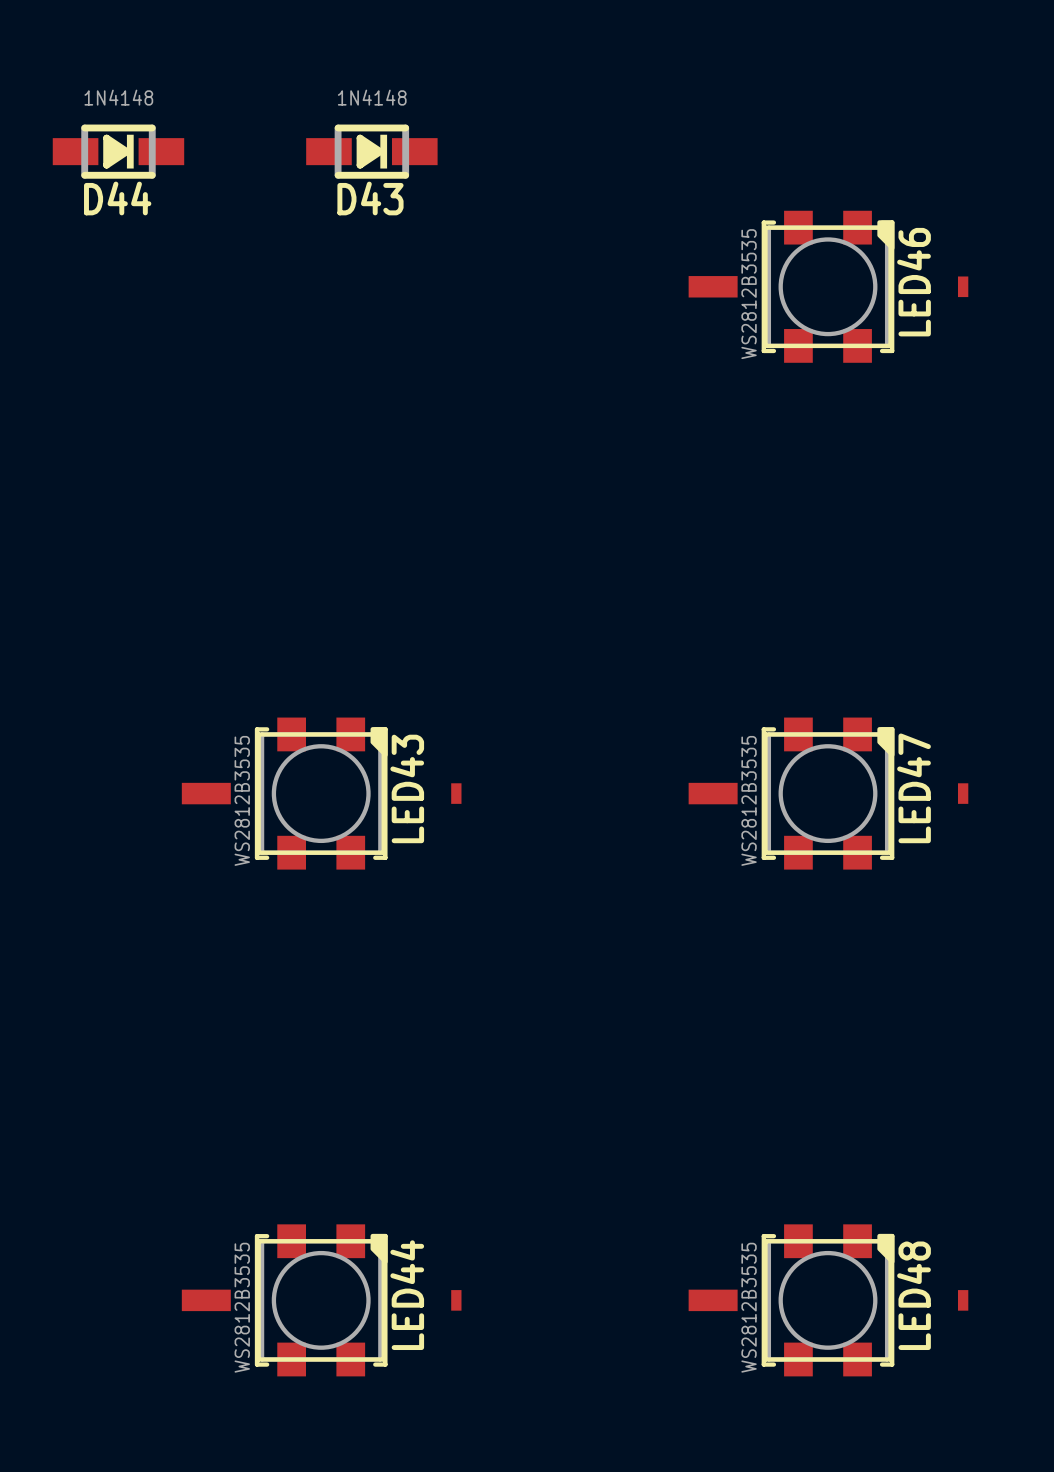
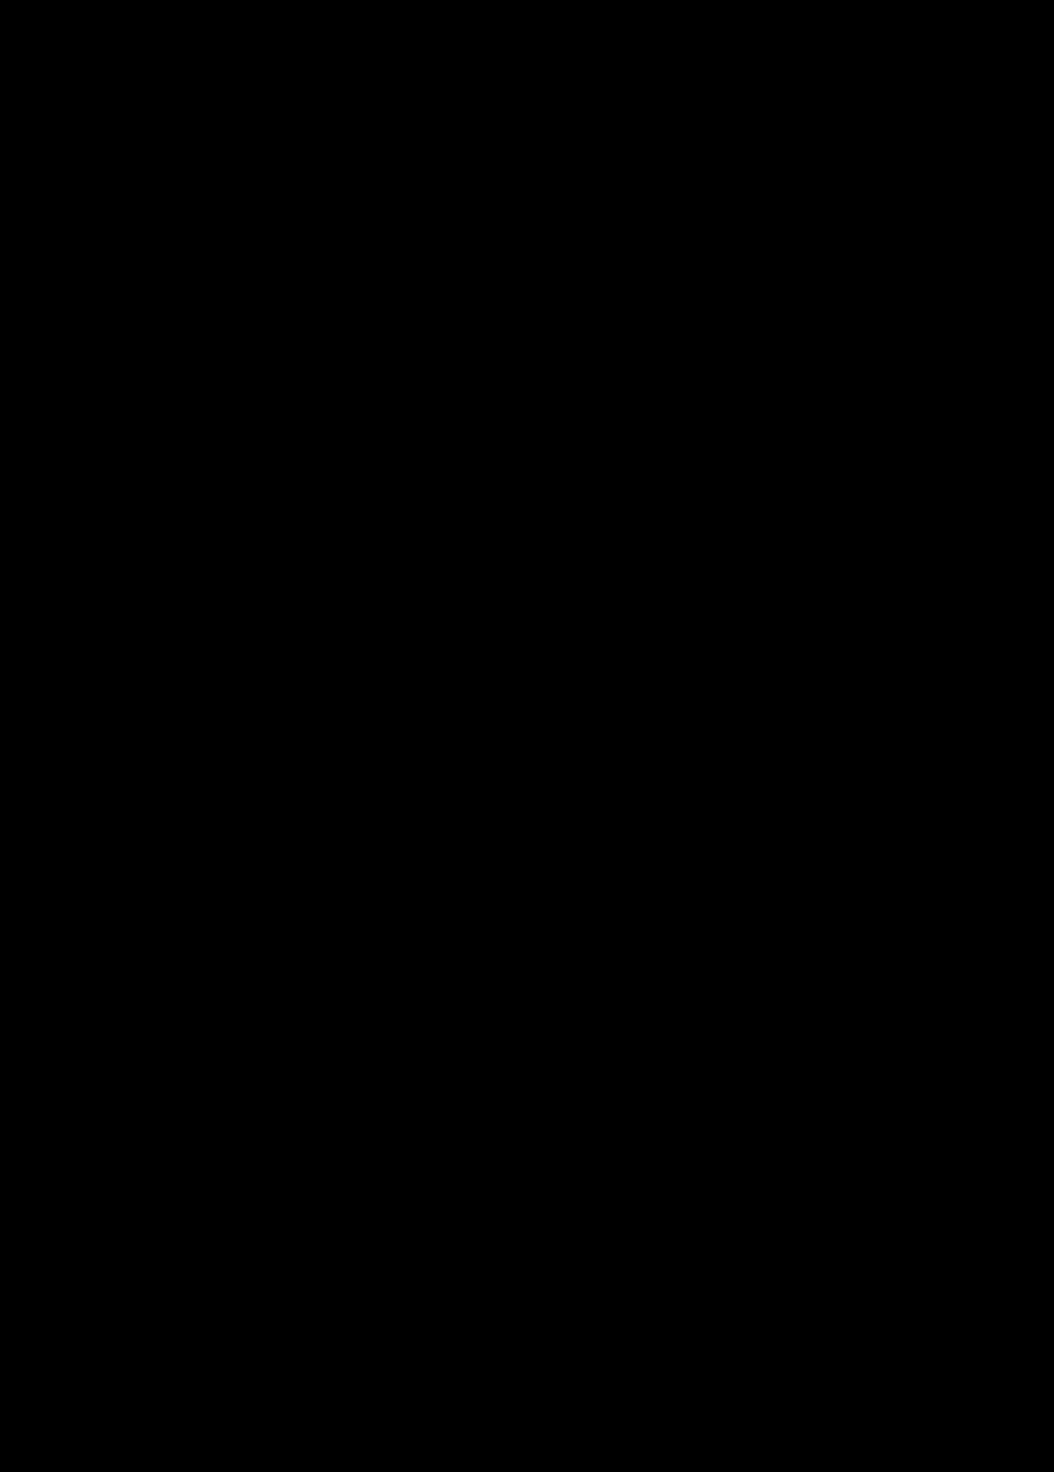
D44: 1N4148 (118, 151) -> none
D43: 1N4148 (371, 151) -> none
LED46: WS2812B3535 (828, 286) -> none
part: (828, 286) -> none
LED43: WS2812B3535 (321, 793) -> none
part: (321, 793) -> none
LED47: WS2812B3535 (828, 793) -> none
part: (828, 793) -> none
LED44: WS2812B3535 (321, 1300) -> none
part: (321, 1300) -> none
LED48: WS2812B3535 (828, 1300) -> none
part: (828, 1300) -> none

